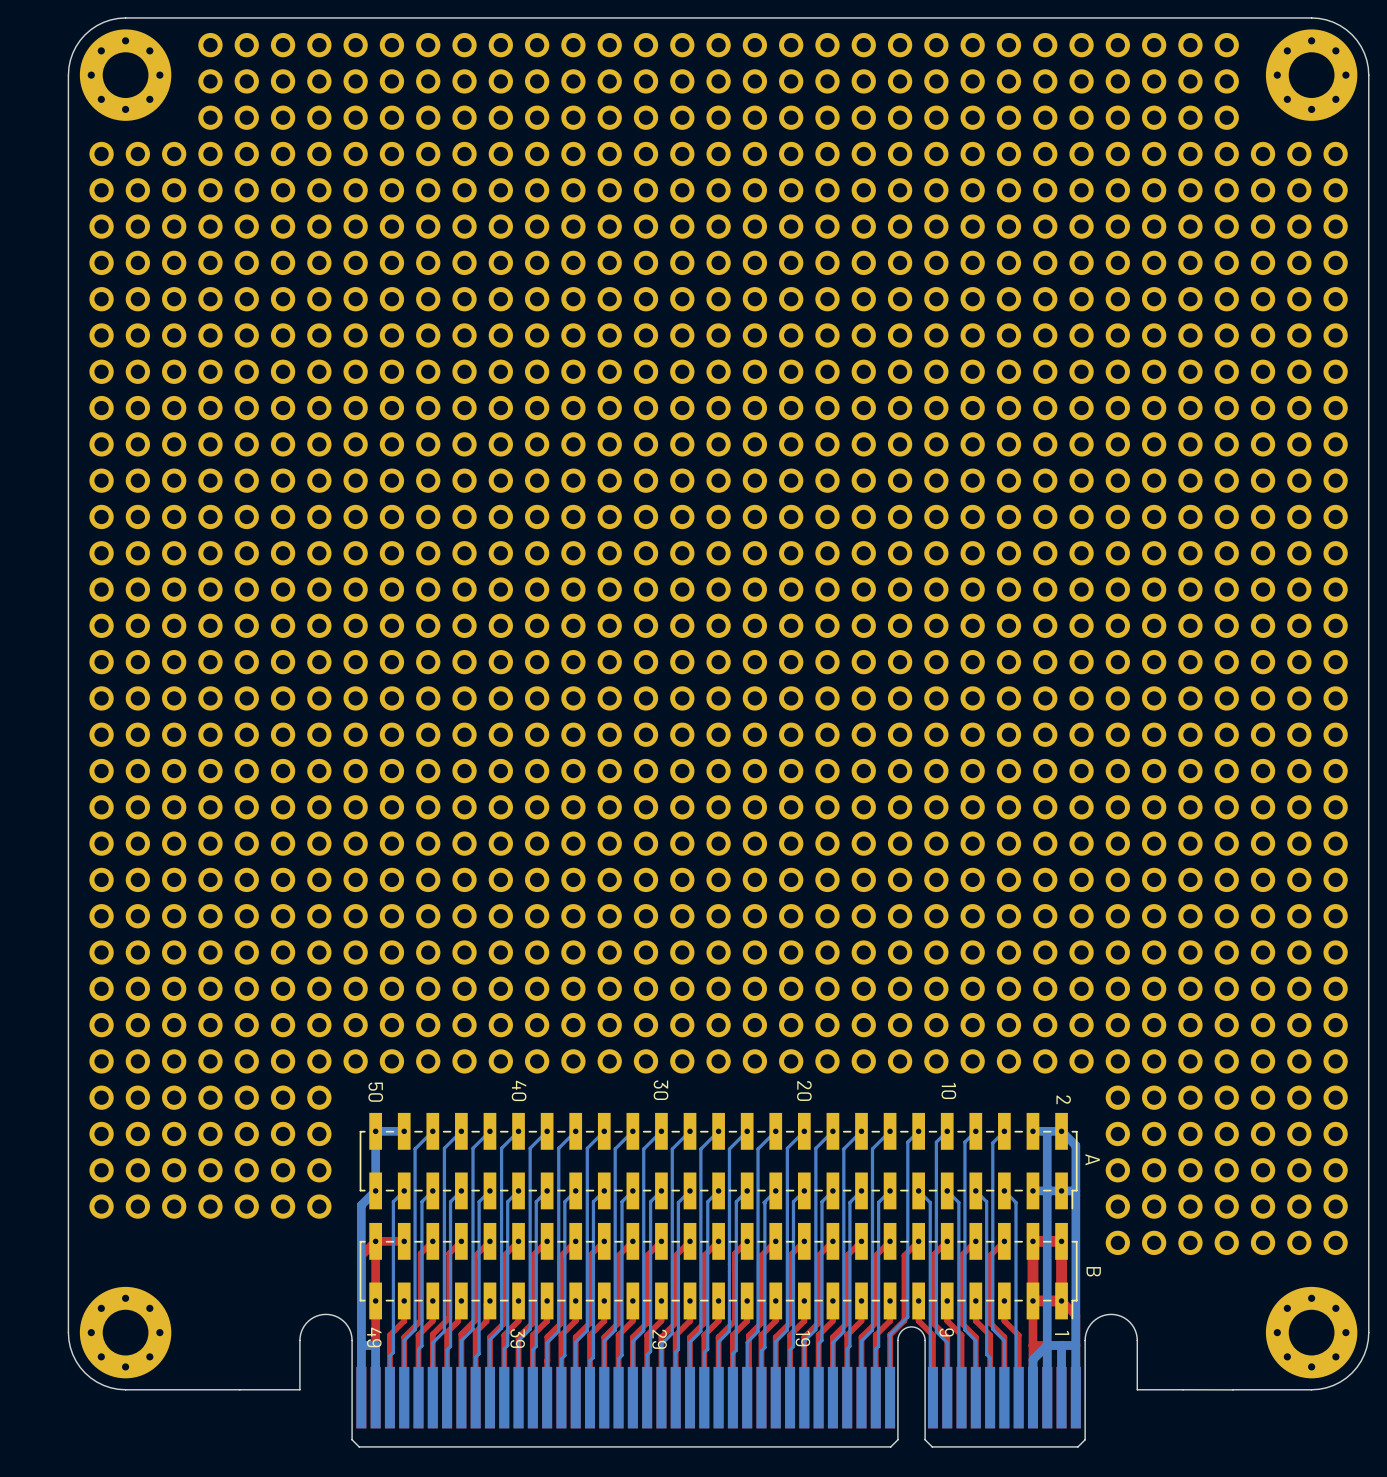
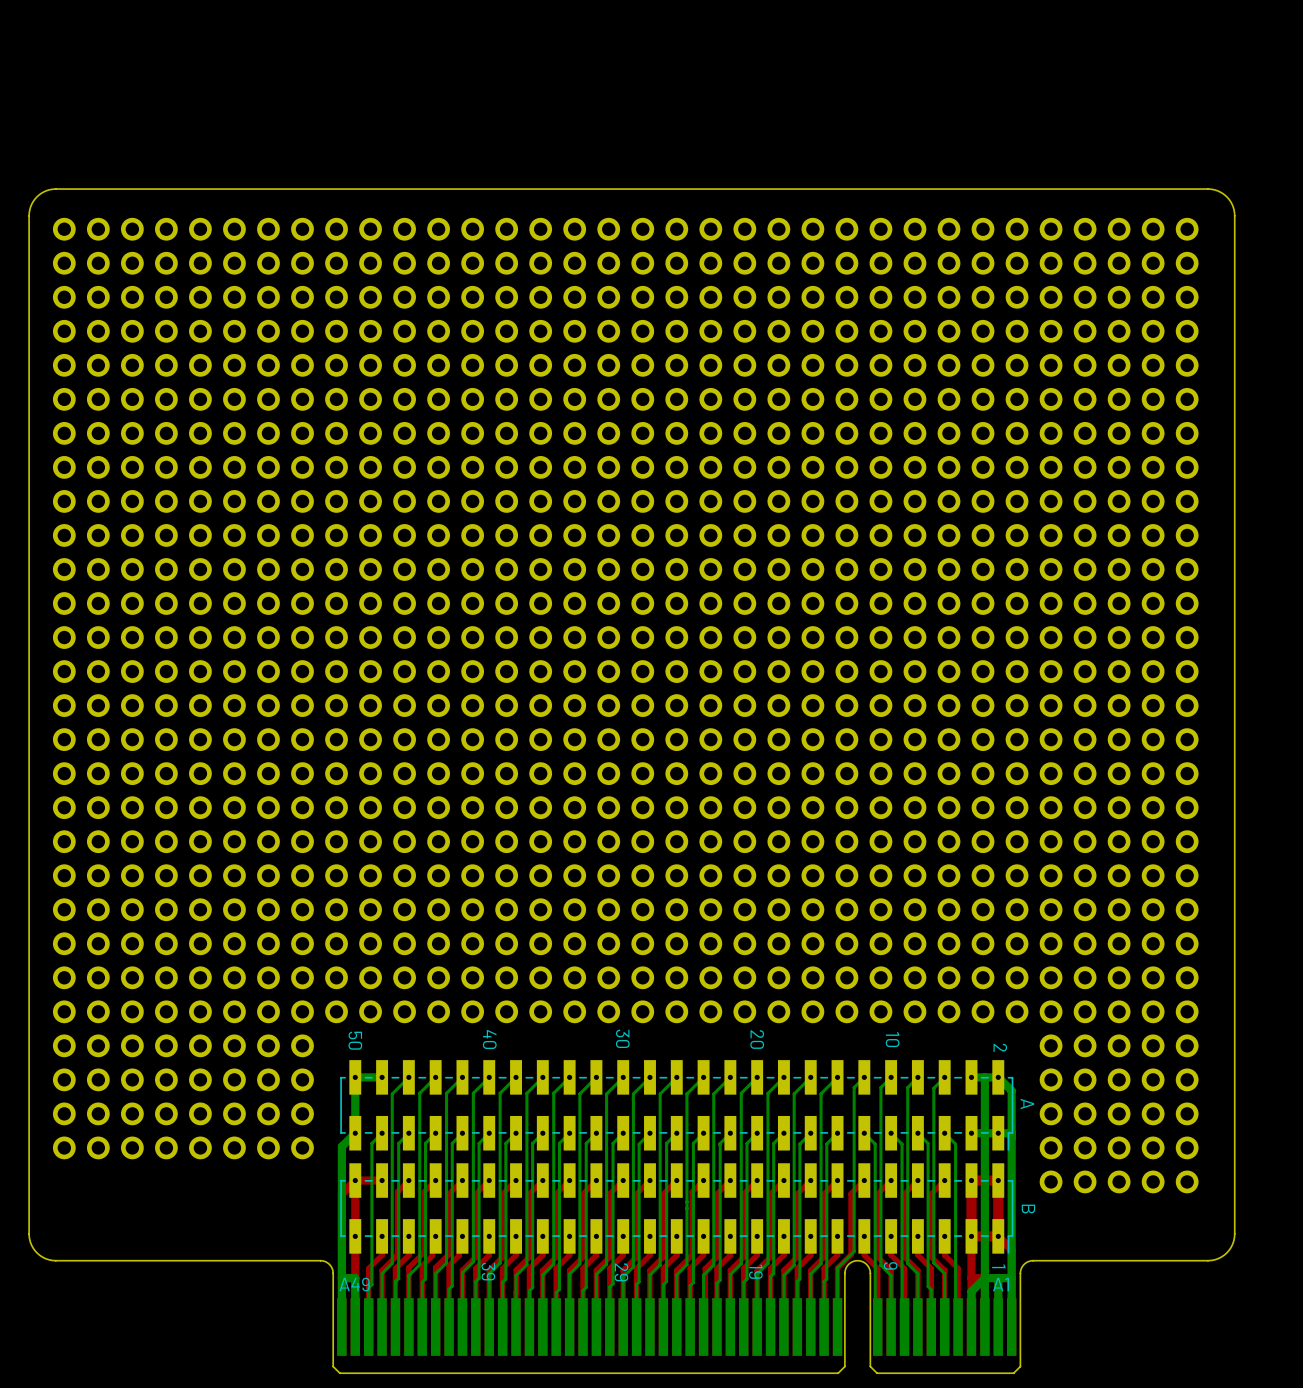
part: (210, 45) -> none
part: (246, 45) -> none
part: (283, 45) -> none
part: (319, 45) -> none
part: (355, 45) -> none
part: (391, 45) -> none
part: (428, 45) -> none
part: (464, 45) -> none
part: (500, 45) -> none
part: (537, 45) -> none
part: (573, 45) -> none
part: (609, 45) -> none
part: (646, 45) -> none
part: (682, 45) -> none
part: (718, 45) -> none
part: (754, 45) -> none
part: (791, 45) -> none
part: (827, 45) -> none
part: (863, 45) -> none
part: (900, 45) -> none
part: (936, 45) -> none
part: (972, 45) -> none
part: (1008, 45) -> none
part: (1045, 45) -> none
part: (1081, 45) -> none
part: (1117, 45) -> none
part: (1154, 45) -> none
part: (1190, 45) -> none
part: (1226, 45) -> none
part: (125, 75) -> none
part: (1311, 75) -> none
part: (210, 81) -> none
part: (246, 81) -> none
part: (283, 81) -> none
part: (319, 81) -> none
part: (355, 81) -> none
part: (391, 81) -> none
part: (428, 81) -> none
part: (464, 81) -> none
part: (500, 81) -> none
part: (537, 81) -> none
part: (573, 81) -> none
part: (609, 81) -> none
part: (646, 81) -> none
part: (682, 81) -> none
part: (718, 81) -> none
part: (754, 81) -> none
part: (791, 81) -> none
part: (827, 81) -> none
part: (863, 81) -> none
part: (900, 81) -> none
part: (936, 81) -> none
part: (972, 81) -> none
part: (1008, 81) -> none
part: (1045, 81) -> none
part: (1081, 81) -> none
part: (1117, 81) -> none
part: (1154, 81) -> none
part: (1190, 81) -> none
part: (1226, 81) -> none
part: (210, 117) -> none
part: (246, 117) -> none
part: (283, 117) -> none
part: (319, 117) -> none
part: (355, 117) -> none
part: (391, 117) -> none
part: (428, 117) -> none
part: (464, 117) -> none
part: (500, 117) -> none
part: (537, 117) -> none
part: (573, 117) -> none
part: (609, 117) -> none
part: (646, 117) -> none
part: (682, 117) -> none
part: (718, 117) -> none
part: (754, 117) -> none
part: (791, 117) -> none
part: (827, 117) -> none
part: (863, 117) -> none
part: (900, 117) -> none
part: (936, 117) -> none
part: (972, 117) -> none
part: (1008, 117) -> none
part: (1045, 117) -> none
part: (1081, 117) -> none
part: (1117, 117) -> none
part: (1154, 117) -> none
part: (1190, 117) -> none
part: (1226, 117) -> none
part: (101, 154) -> none
part: (137, 154) -> none
part: (174, 154) -> none
part: (210, 154) -> none
part: (246, 154) -> none
part: (283, 154) -> none
part: (319, 154) -> none
part: (355, 154) -> none
part: (391, 154) -> none
part: (428, 154) -> none
part: (464, 154) -> none
part: (500, 154) -> none
part: (537, 154) -> none
part: (573, 154) -> none
part: (609, 154) -> none
part: (646, 154) -> none
part: (682, 154) -> none
part: (718, 154) -> none
part: (754, 154) -> none
part: (791, 154) -> none
part: (827, 154) -> none
part: (863, 154) -> none
part: (900, 154) -> none
part: (936, 154) -> none
part: (972, 154) -> none
part: (1008, 154) -> none
part: (1045, 154) -> none
part: (1081, 154) -> none
part: (1117, 154) -> none
part: (1154, 154) -> none
part: (1190, 154) -> none
part: (1226, 154) -> none
part: (1263, 154) -> none
part: (1299, 154) -> none
part: (1335, 154) -> none
part: (101, 190) -> none
part: (137, 190) -> none
part: (174, 190) -> none
part: (210, 190) -> none
part: (246, 190) -> none
part: (283, 190) -> none
part: (319, 190) -> none
part: (355, 190) -> none
part: (391, 190) -> none
part: (428, 190) -> none
part: (464, 190) -> none
part: (500, 190) -> none
part: (537, 190) -> none
part: (573, 190) -> none
part: (609, 190) -> none
part: (646, 190) -> none
part: (682, 190) -> none
part: (718, 190) -> none
part: (754, 190) -> none
part: (791, 190) -> none
part: (827, 190) -> none
part: (863, 190) -> none
part: (900, 190) -> none
part: (936, 190) -> none
part: (972, 190) -> none
part: (1008, 190) -> none
part: (1045, 190) -> none
part: (1081, 190) -> none
part: (1117, 190) -> none
part: (1154, 190) -> none
part: (1190, 190) -> none
part: (1226, 190) -> none
part: (1263, 190) -> none
part: (1299, 190) -> none
part: (1335, 190) -> none
part: none -> (64, 229)
part: (1299, 226) -> none
part: (1335, 226) -> none
part: none -> (64, 263)
part: (1299, 262) -> none
part: (1335, 262) -> none
part: none -> (64, 297)
part: (1299, 299) -> none
part: (1335, 299) -> none
part: none -> (64, 331)
part: (1299, 335) -> none
part: (1335, 335) -> none
part: none -> (64, 365)
part: (1299, 371) -> none
part: (1335, 371) -> none
part: none -> (64, 399)
part: (1299, 408) -> none
part: (1335, 408) -> none
part: none -> (64, 433)
part: (1299, 444) -> none
part: (1335, 444) -> none
part: none -> (64, 467)
part: (1299, 480) -> none
part: (1335, 480) -> none
part: none -> (64, 501)
part: (1299, 516) -> none
part: (1335, 516) -> none
part: none -> (64, 535)
part: (1299, 553) -> none
part: (1335, 553) -> none
part: none -> (64, 569)
part: (1299, 589) -> none
part: (1335, 589) -> none
part: none -> (64, 603)
part: (1299, 625) -> none
part: (1335, 625) -> none
part: none -> (64, 637)
part: (1299, 662) -> none
part: (1335, 662) -> none
part: none -> (64, 671)
part: (1299, 698) -> none
part: (1335, 698) -> none
part: none -> (64, 705)
part: (1299, 734) -> none
part: (1335, 734) -> none
part: none -> (64, 739)
part: (1299, 771) -> none
part: (1335, 771) -> none
part: none -> (64, 773)
part: (1299, 807) -> none
part: (1335, 807) -> none
part: none -> (631, 781)
part: none -> (64, 807)
part: (1299, 843) -> none
part: (1335, 843) -> none
part: none -> (64, 841)
part: (1299, 879) -> none
part: (1335, 879) -> none
part: none -> (64, 875)
part: (1299, 916) -> none
part: (1335, 916) -> none
part: none -> (64, 909)
part: (1299, 952) -> none
part: (1335, 952) -> none
part: none -> (64, 943)
part: (1299, 988) -> none
part: (1335, 988) -> none
part: none -> (64, 977)
part: (1299, 1025) -> none
part: (1335, 1025) -> none
part: none -> (64, 1011)
part: (1299, 1061) -> none
part: (1335, 1061) -> none
part: none -> (64, 1045)
part: (1299, 1097) -> none
part: (1335, 1097) -> none
part: none -> (64, 1079)
part: (1299, 1133) -> none
part: (1335, 1133) -> none
part: none -> (64, 1113)
part: (1299, 1170) -> none
part: (1335, 1170) -> none
part: none -> (64, 1147)
part: (1299, 1206) -> none
part: (1335, 1206) -> none
part: (1299, 1242) -> none
part: (1335, 1242) -> none
part: (125, 1332) -> none
part: (1311, 1332) -> none
text: 49 (374, 1337) -> none
part: (718, 1380) -> none
board edge: (1137, 1389) (1233, 1389) -> none
board edge: (1233, 1389) (1311, 1389) (1333, 1385) (1346, 1377) (1356, 1367) (1364, 1354) (1368, 1340) (1368, 75) (1364, 53) (1356, 40) (1346, 29) (1333, 22) (1311, 17) (118, 18) (103, 22) (85, 34) (72, 53) (68, 75) (68, 1340) (72, 1354) (80, 1367) (97, 1382) (110, 1387) (125, 1389) (299, 1389) -> none

